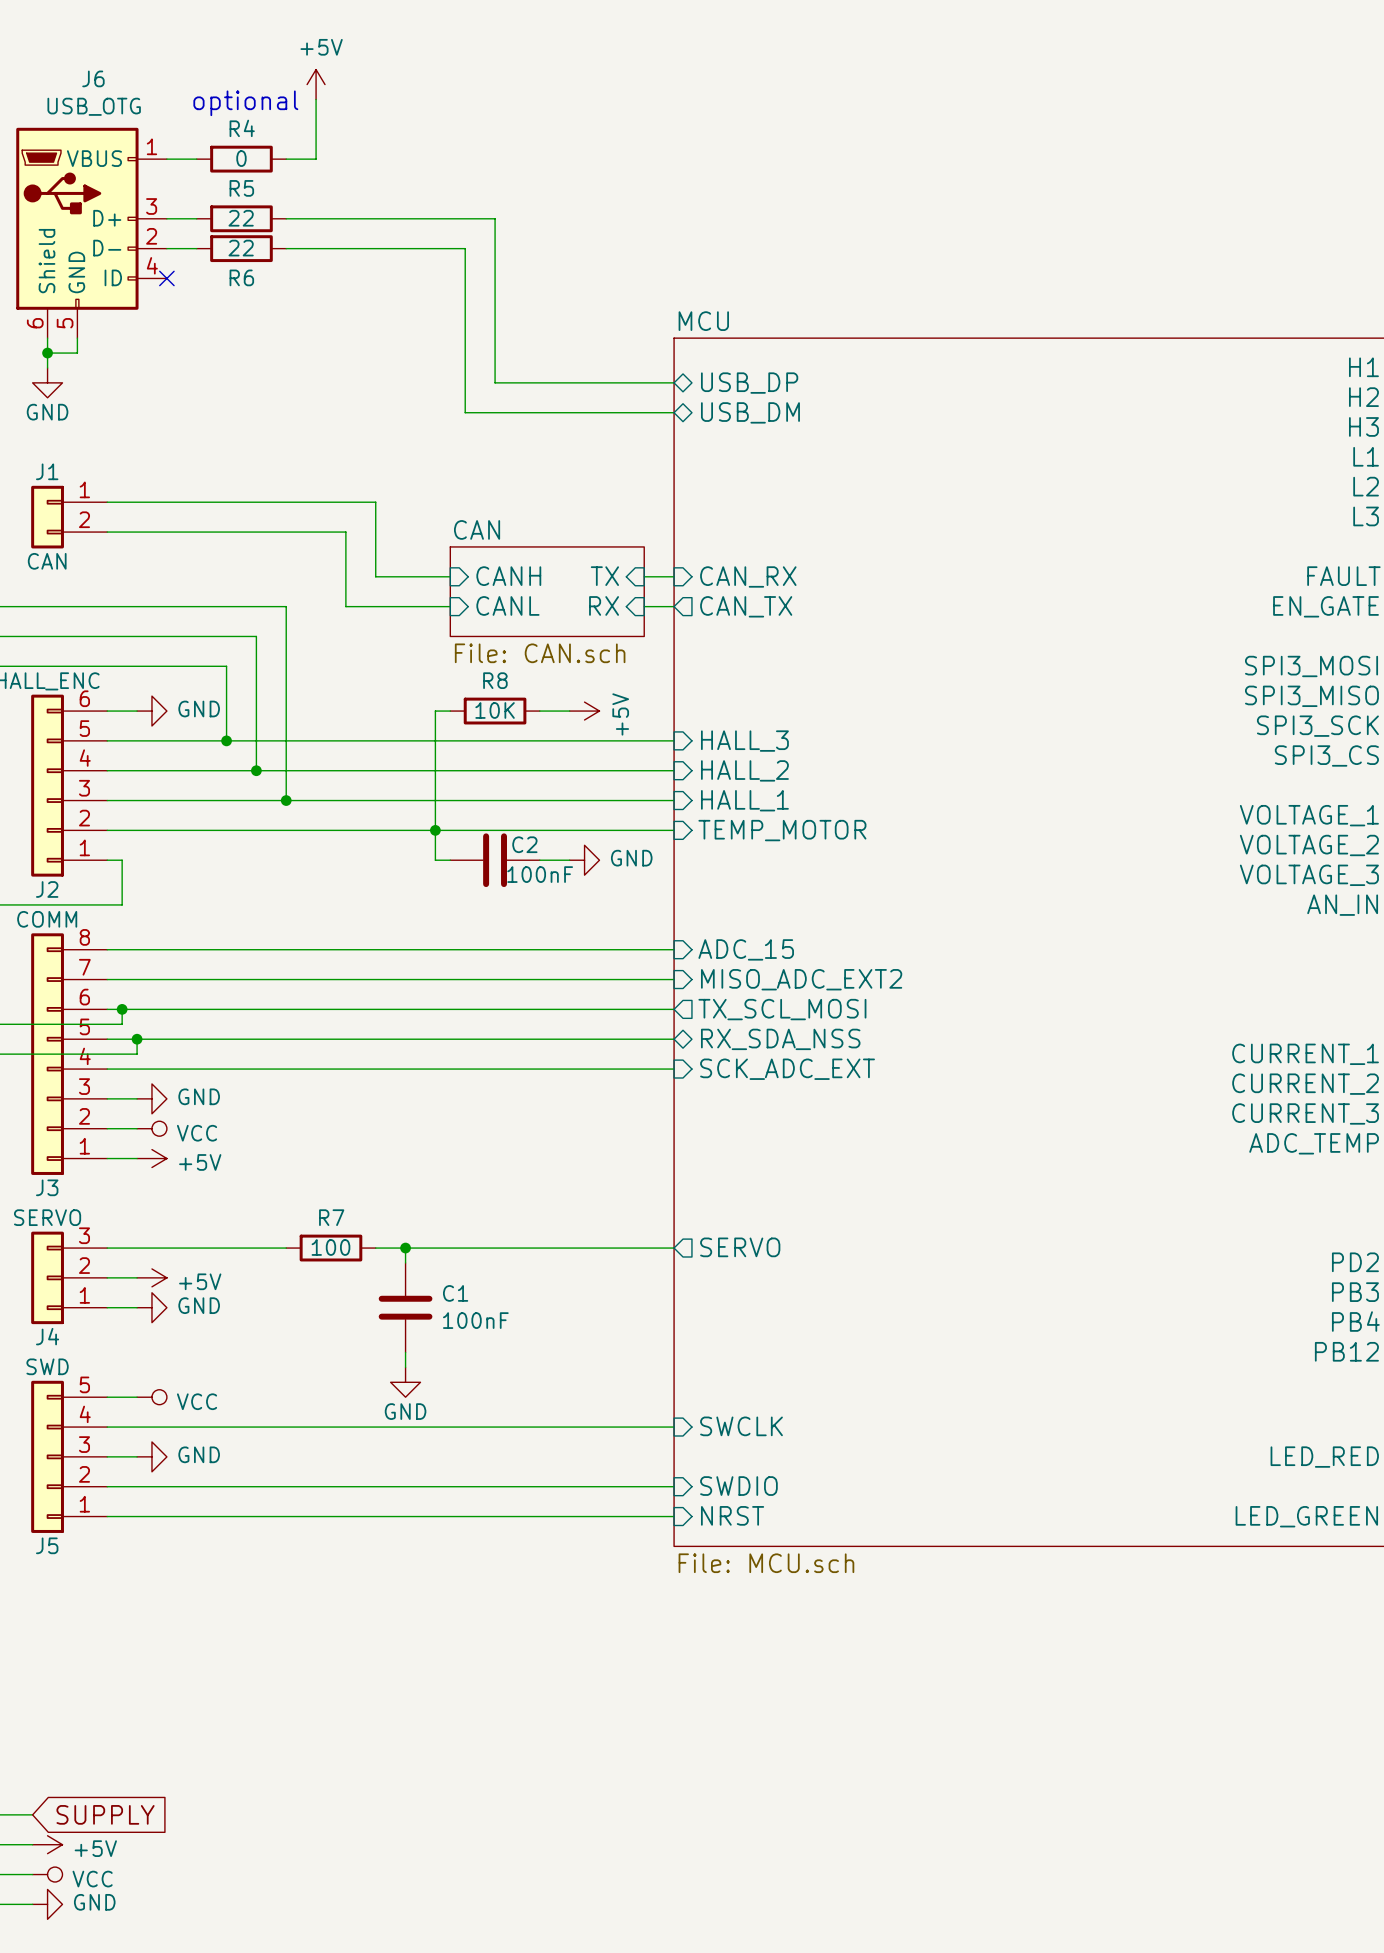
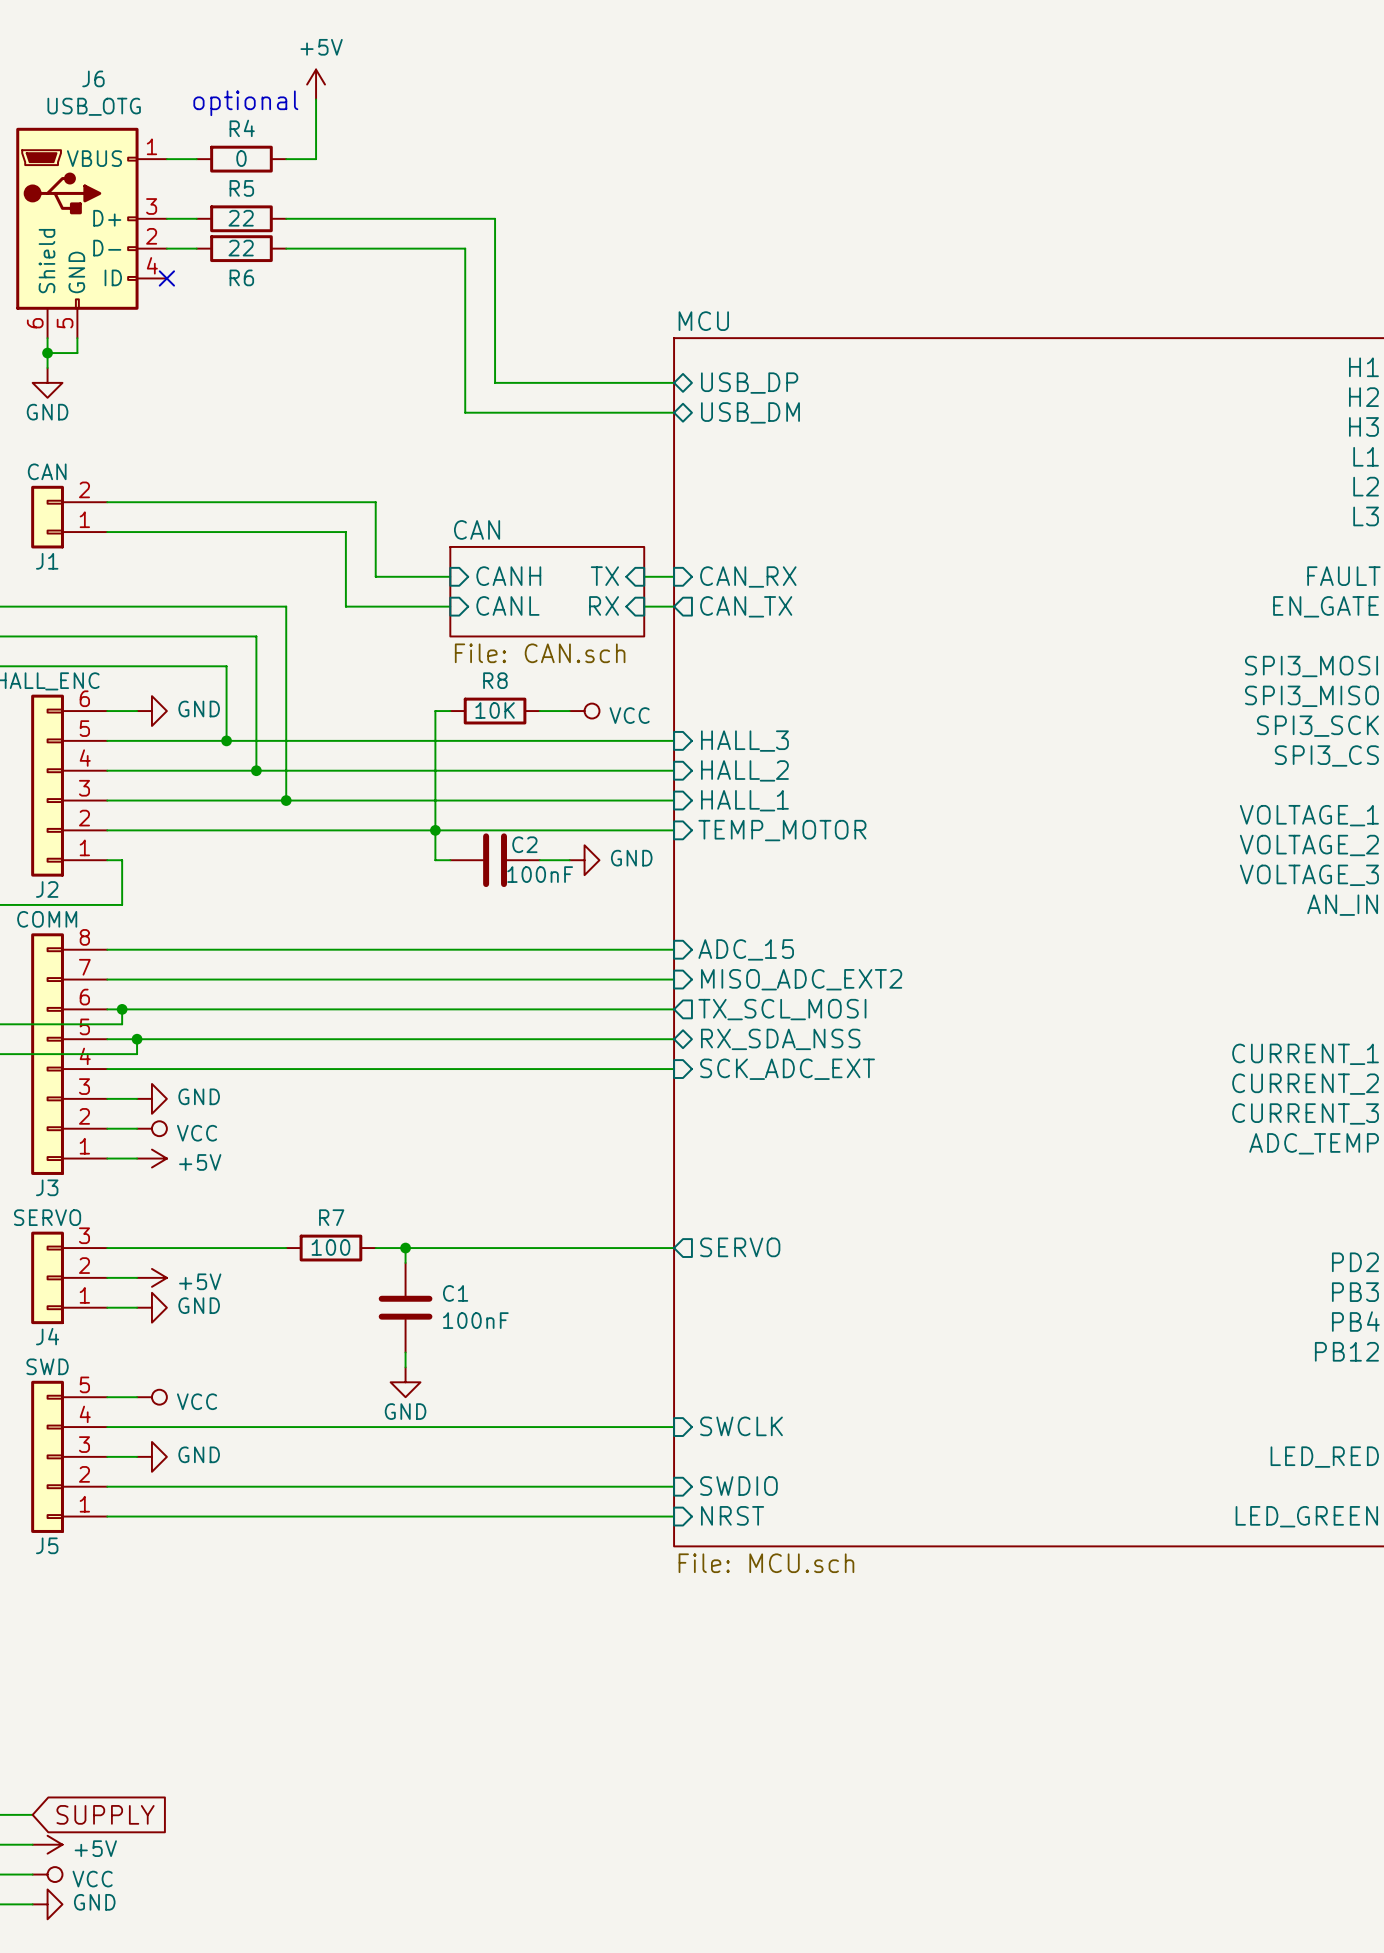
J1 flip: as is (47, 517) -> up-down (47, 517)
power symbol: +5V (584, 711) -> VCC (584, 711)

